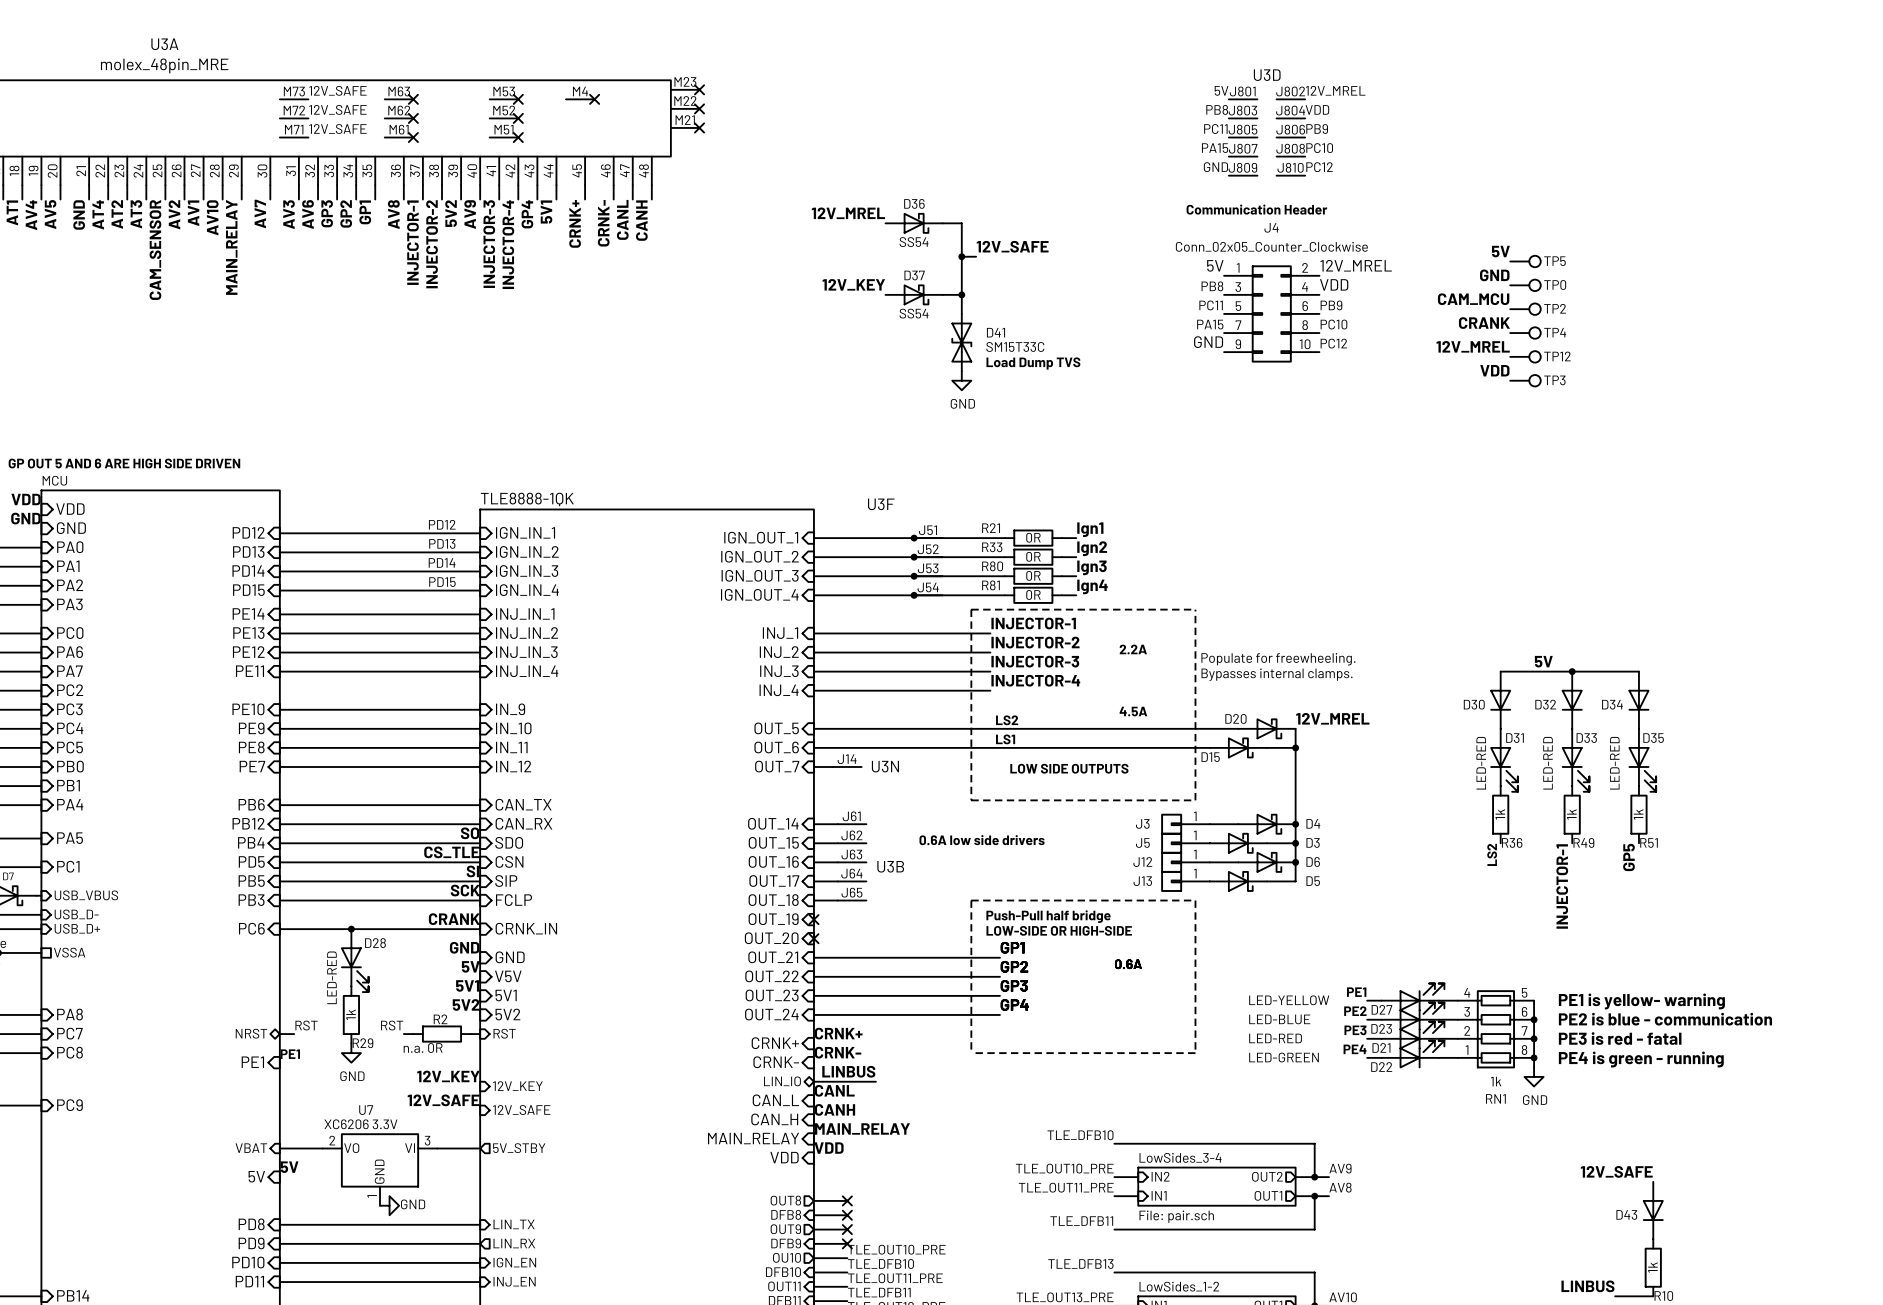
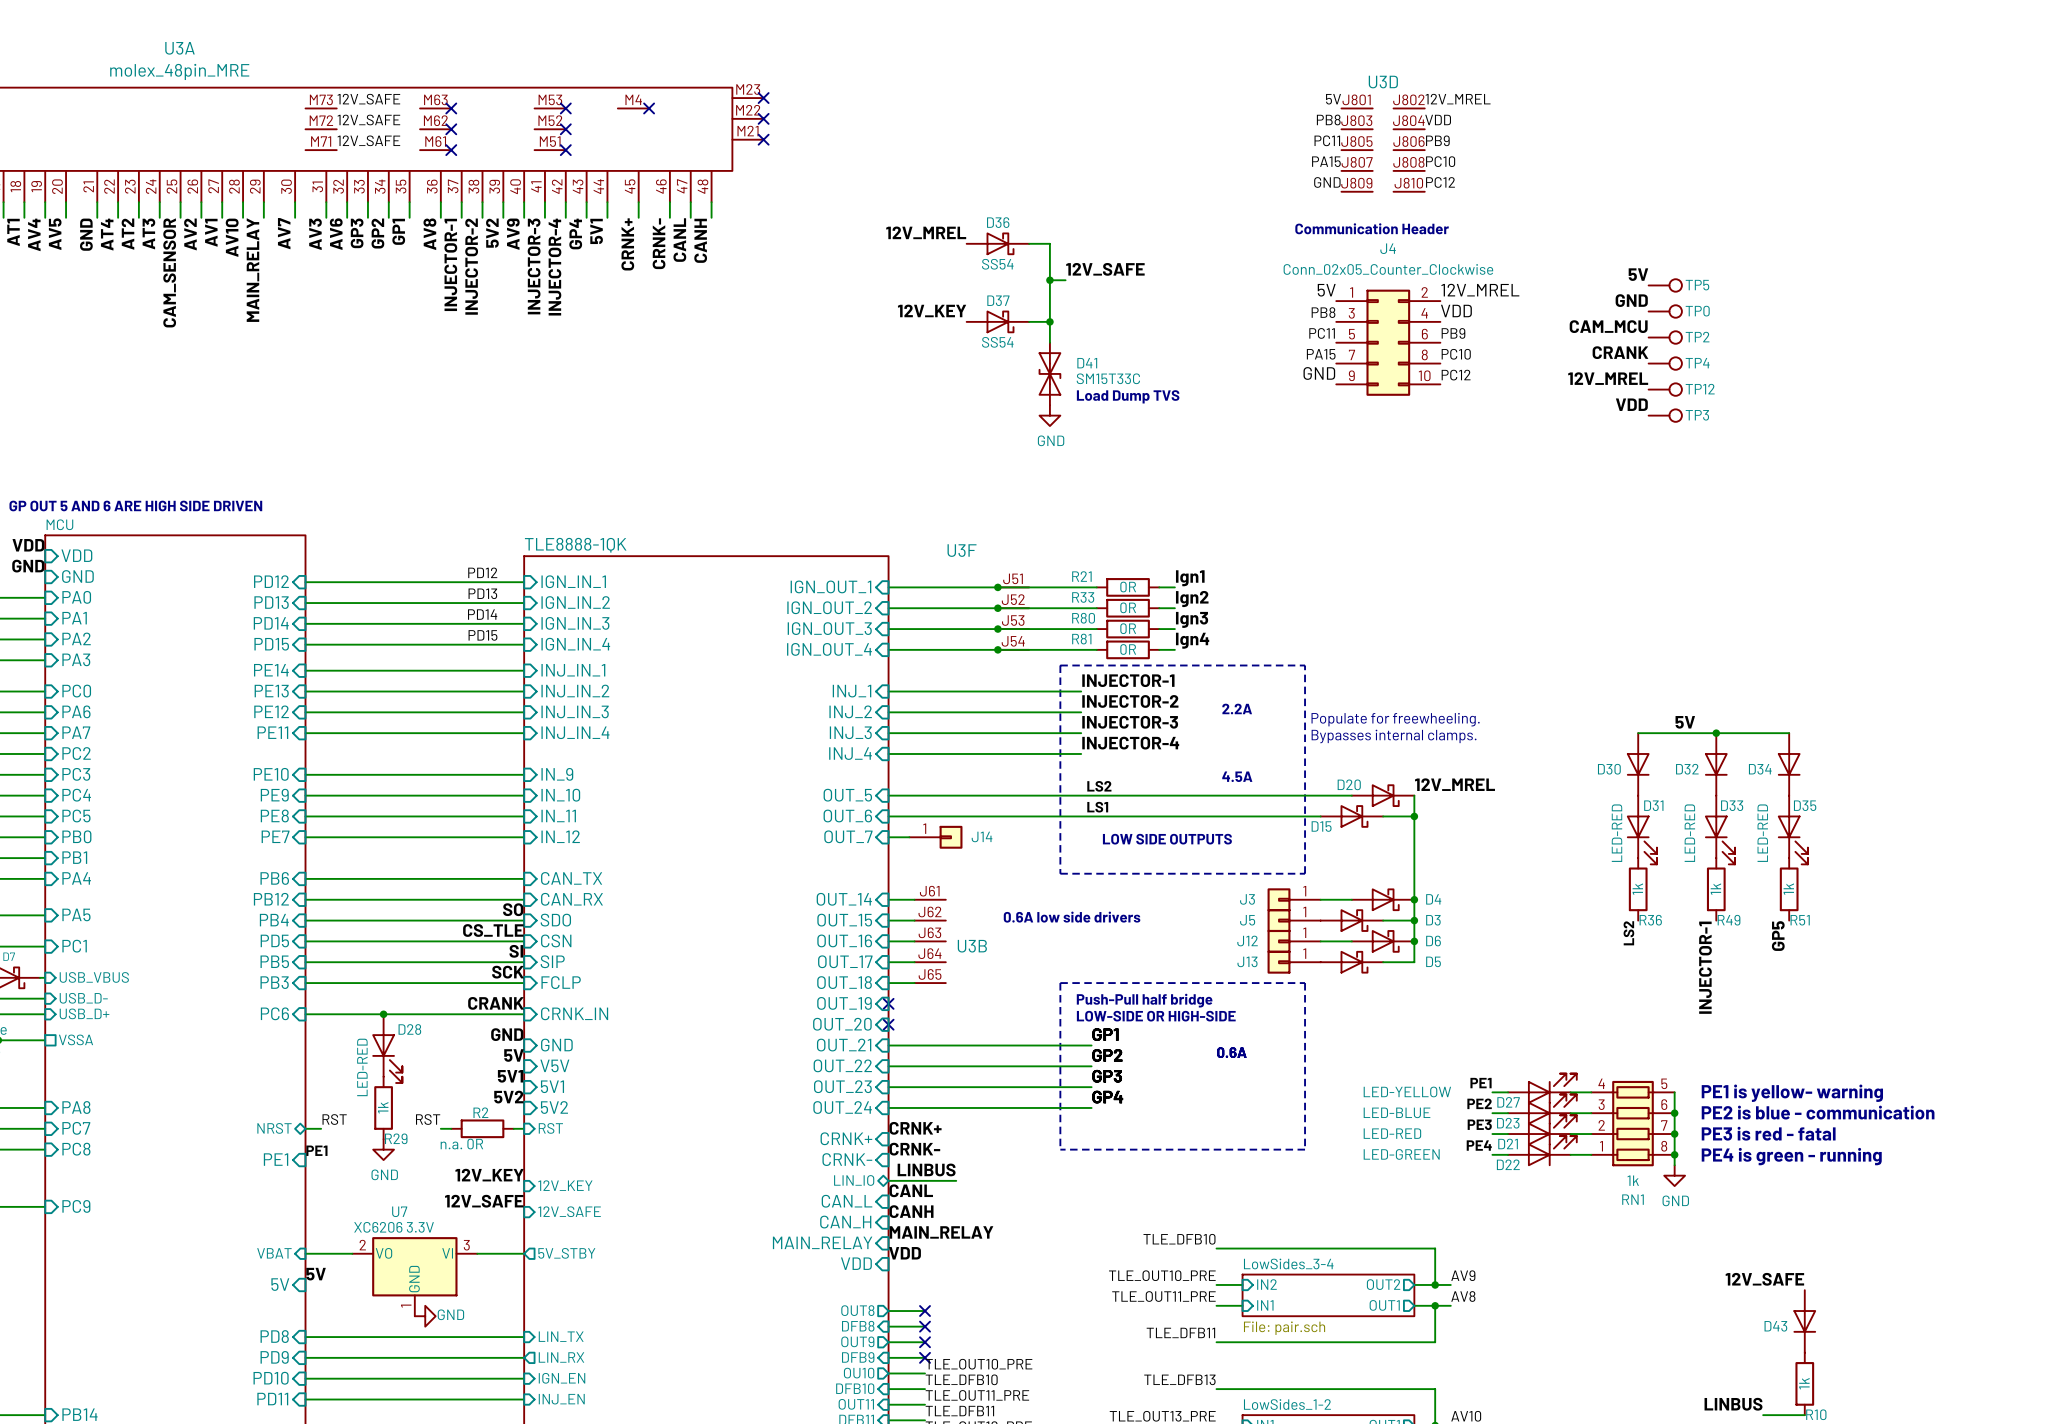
U3N: (847, 766) -> none
J14: none -> (935, 837)

